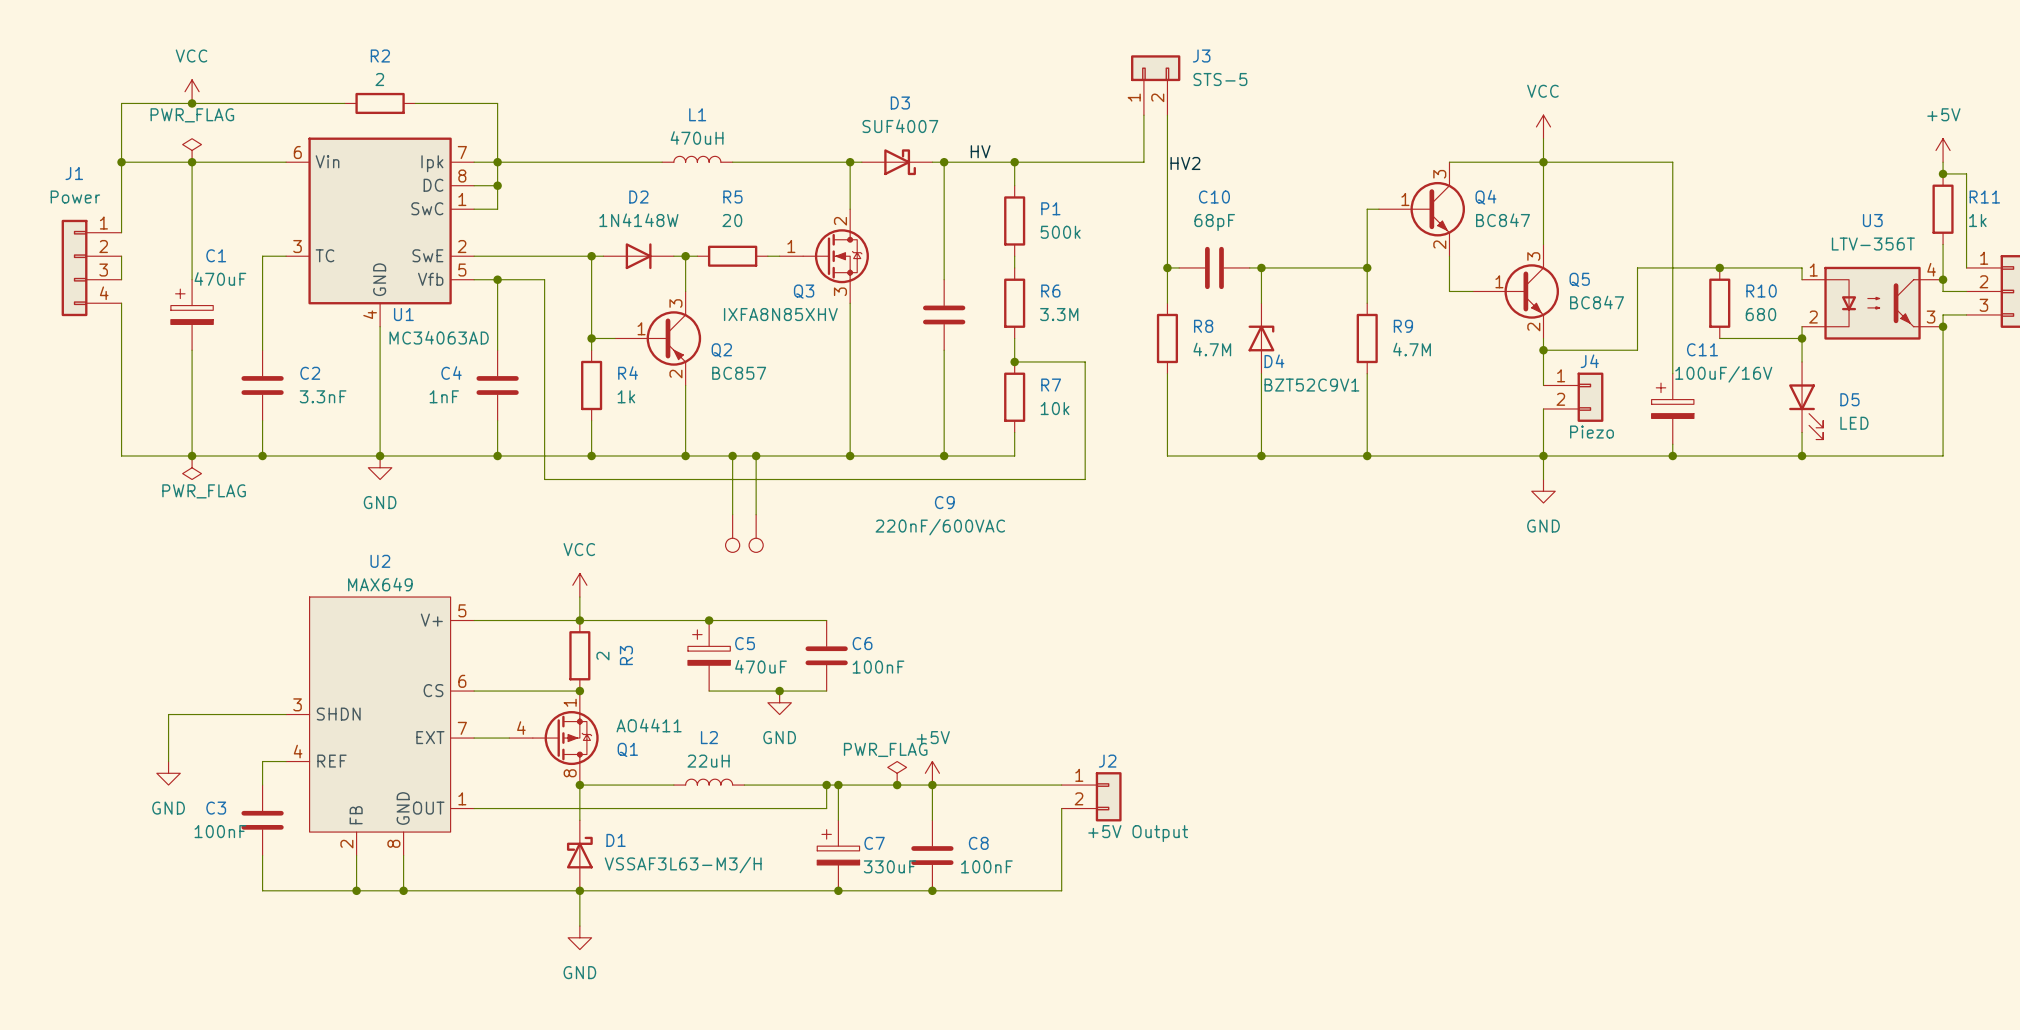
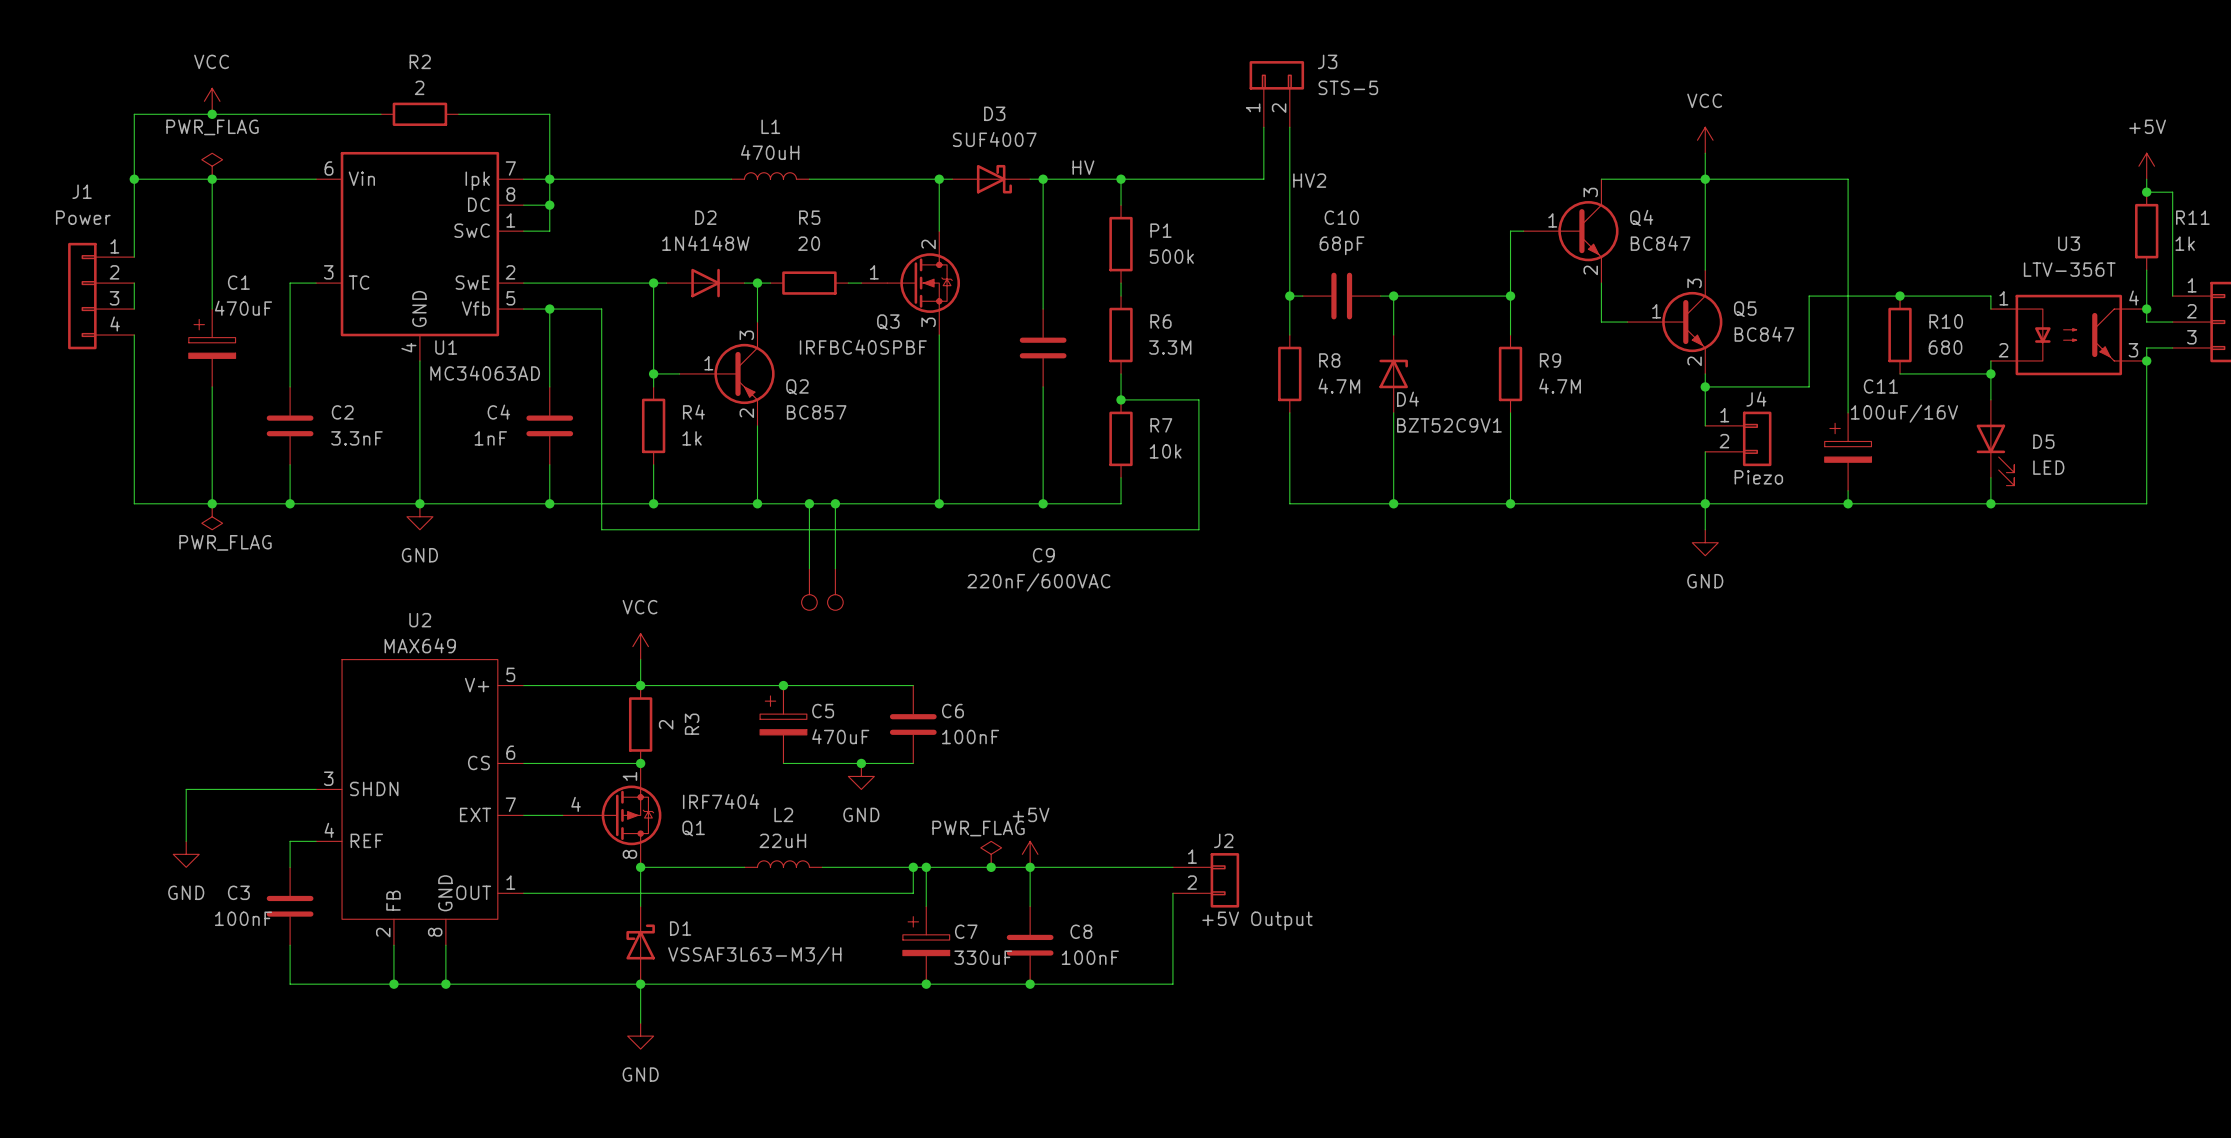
Q3 value: IXFA8N85XHV (780, 314) -> IRFBC40SPBF (863, 347)
Q1 value: AO4411 (649, 725) -> IRF7404 (721, 801)

